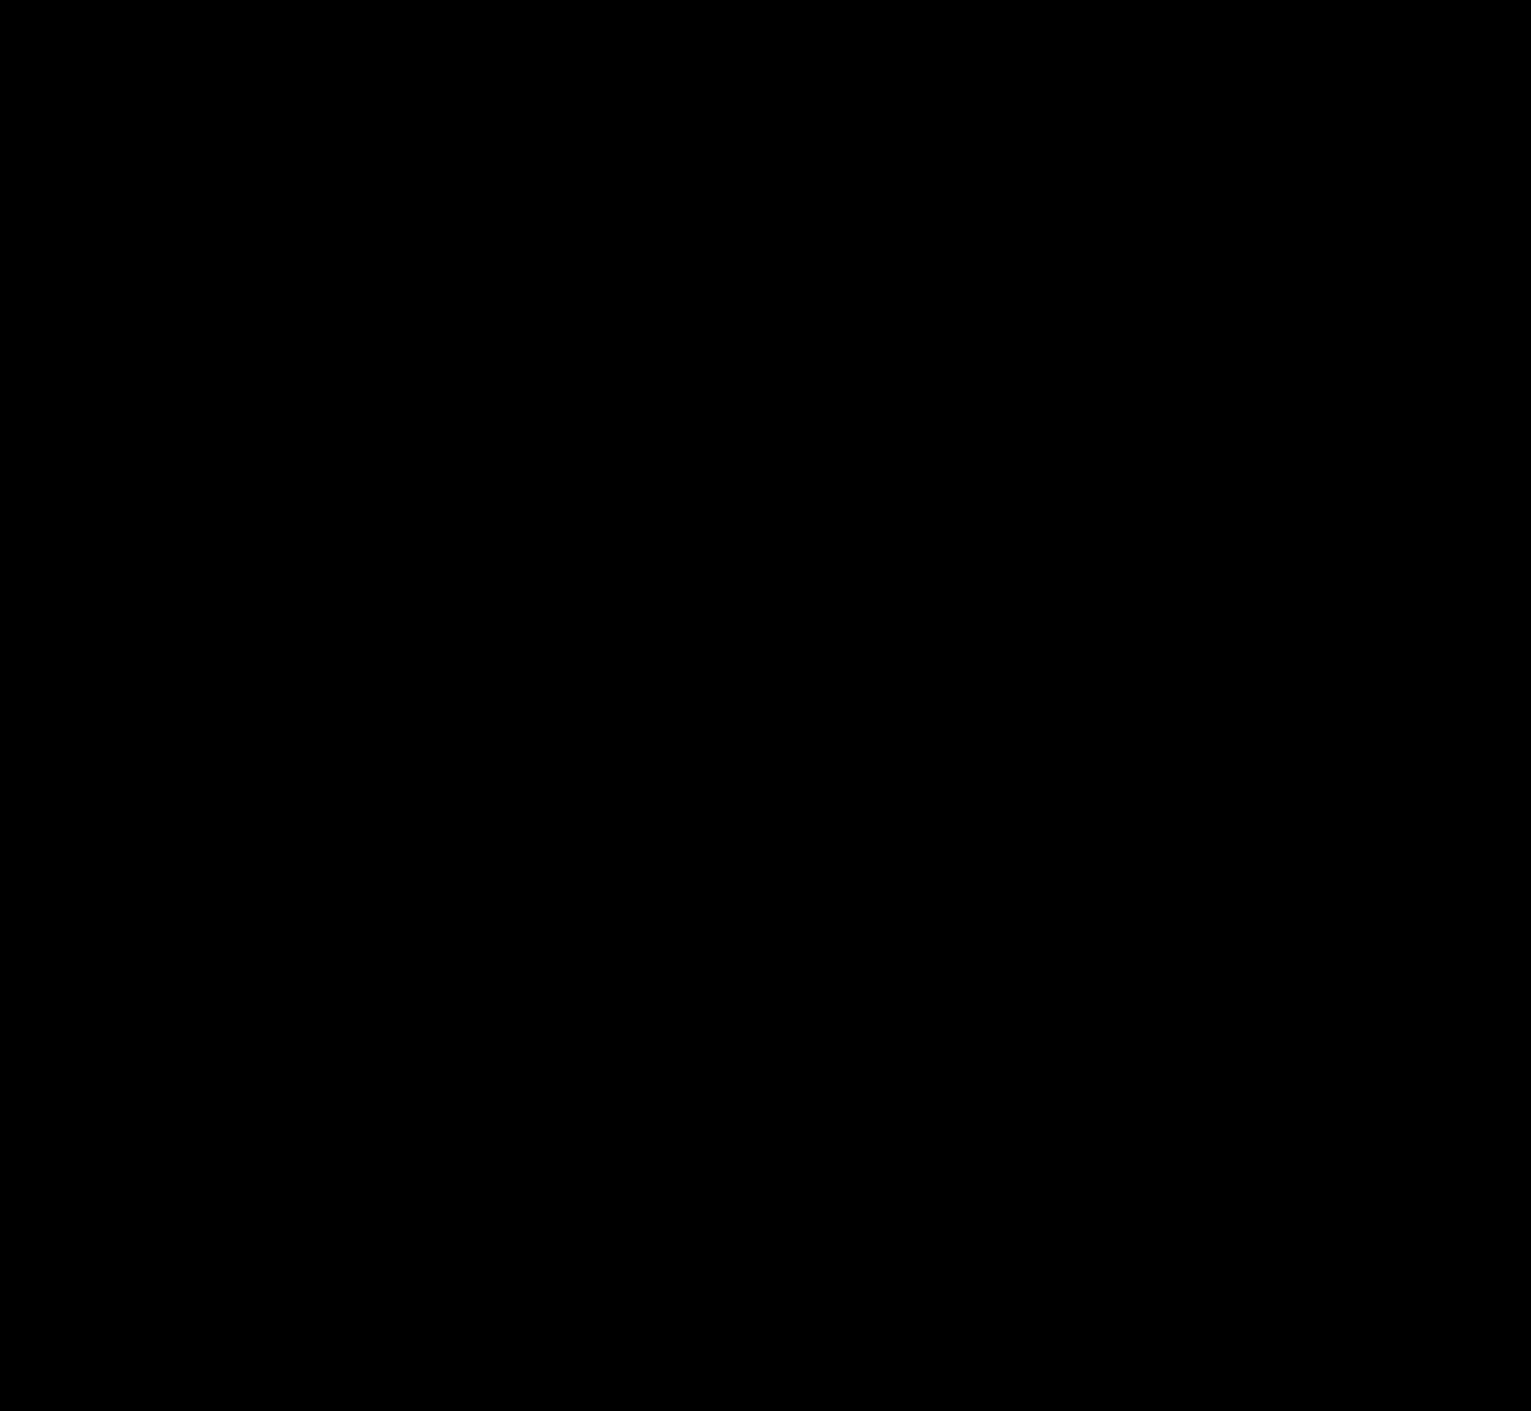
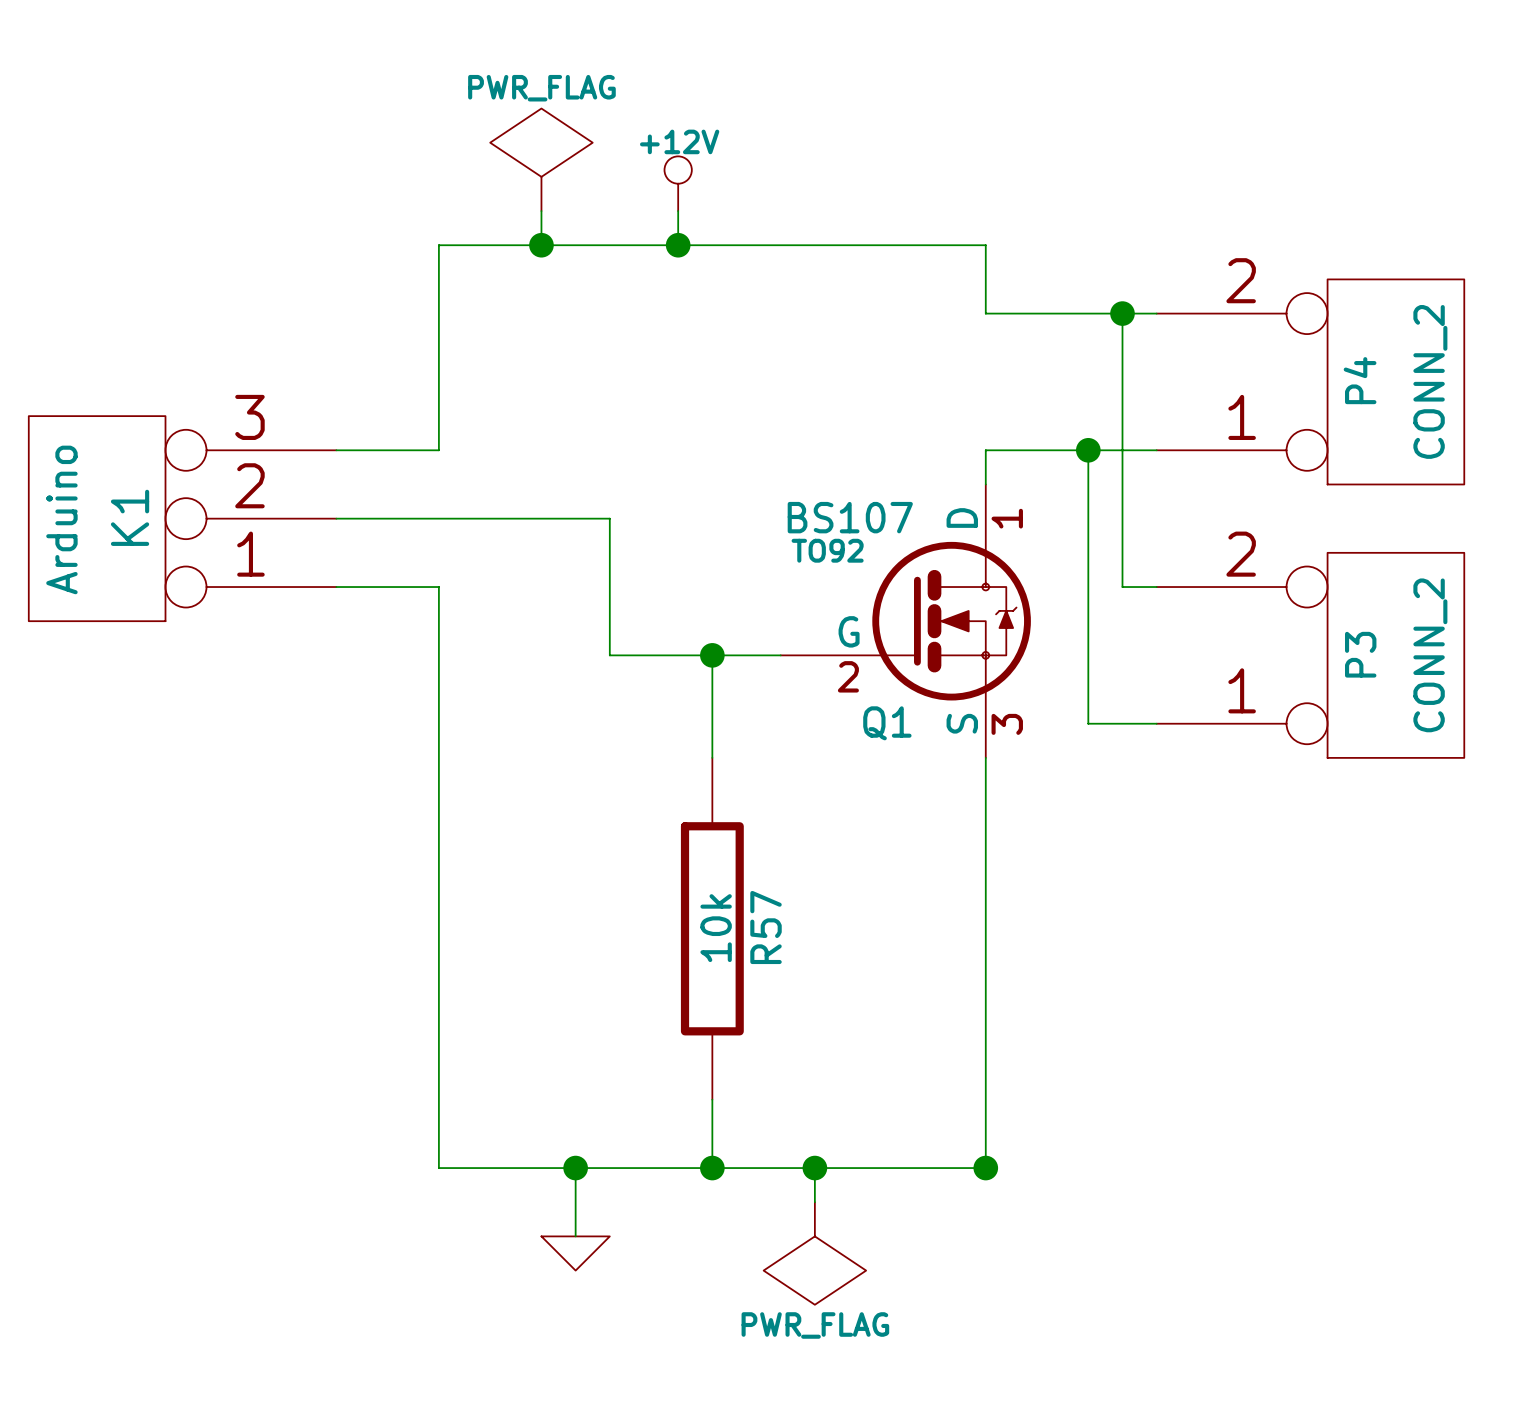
power symbol: none -> PWR_FLAG (541, 159)
power symbol: none -> +12V (678, 183)
wire: none -> (541, 211) (541, 245)
wire: none -> (678, 211) (678, 245)
junction: none -> (541, 245)
junction: none -> (678, 245)
wire: none -> (1122, 313) (1122, 587) (1156, 587)
junction: none -> (1122, 313)
wire: none -> (1156, 313) (985, 313) (985, 245) (438, 245) (438, 450) (336, 450)
P4: none -> CONN_2 (1310, 381)
wire: none -> (1088, 450) (1088, 723) (1156, 723)
junction: none -> (1088, 450)
wire: none -> (1156, 450) (985, 450) (985, 484)
K1: none -> Arduino (182, 518)
wire: none -> (336, 518) (609, 518) (609, 655) (780, 655)
wire: none -> (336, 587) (438, 587) (438, 1168) (985, 1168) (985, 757)
Q1: none -> BS107 (905, 621)
wire: none -> (712, 655) (712, 757)
junction: none -> (712, 655)
P3: none -> CONN_2 (1310, 655)
R57: none -> 10k (712, 928)
wire: none -> (712, 1099) (712, 1168)
wire: none -> (575, 1168) (575, 1236)
junction: none -> (575, 1168)
junction: none -> (712, 1168)
wire: none -> (814, 1168) (814, 1202)
junction: none -> (814, 1168)
junction: none -> (985, 1168)
power symbol: none -> (575, 1253)
power symbol: none -> PWR_FLAG (814, 1253)

